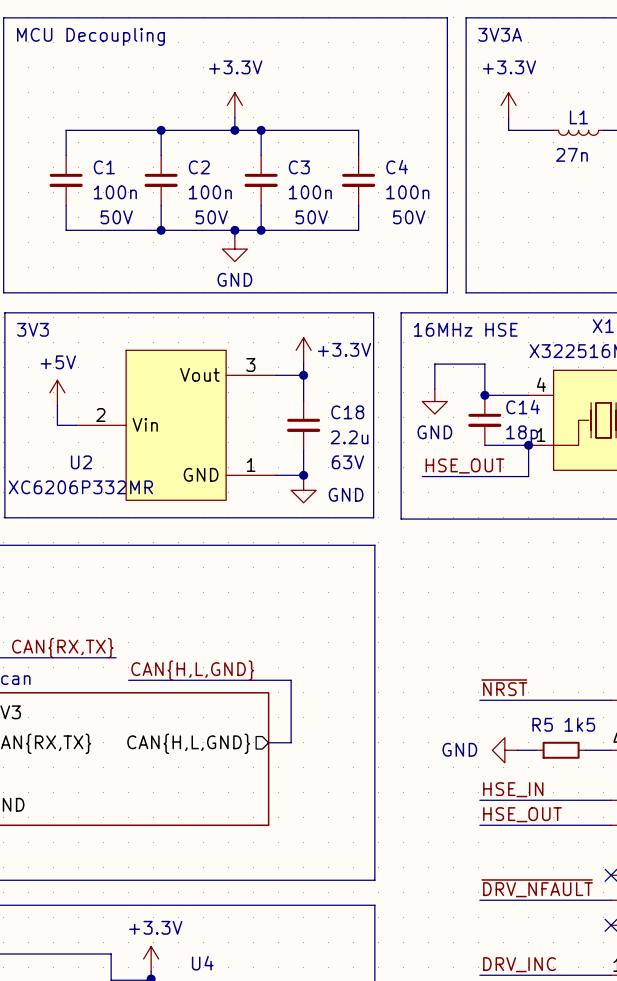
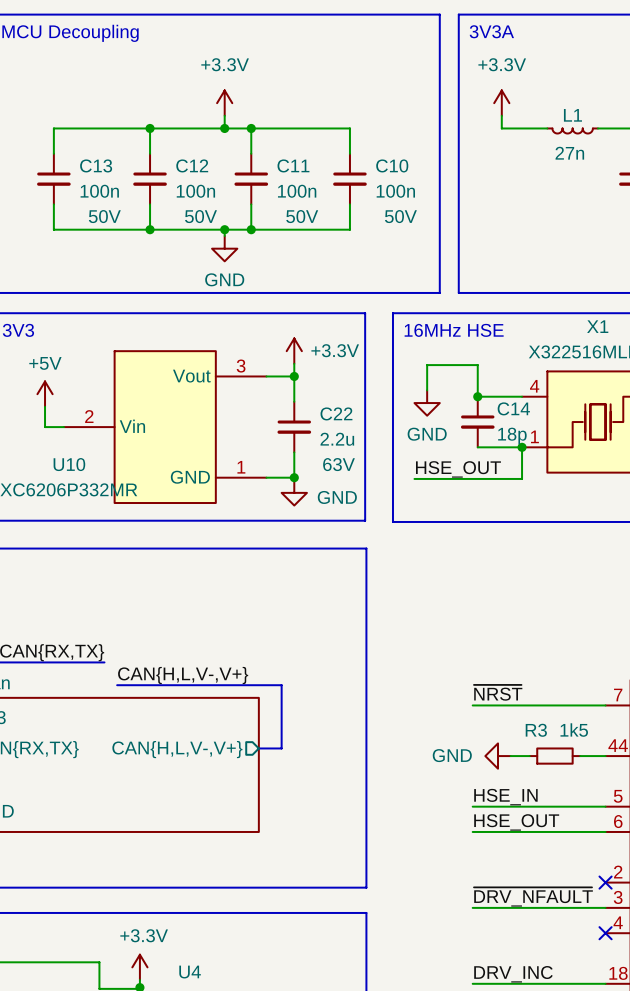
C1 name: C1 (104, 167) -> C13 (96, 165)
C2 name: C2 (199, 167) -> C12 (192, 165)
C3 name: C3 (299, 167) -> C11 (293, 165)
C4 name: C4 (397, 167) -> C10 (392, 165)
C18 name: C18 (347, 412) -> C22 (336, 413)
U2 name: U2 (81, 462) -> U10 (69, 464)
label: CAN{H,L,GND} (192, 670) -> CAN{H,L,V-,V+} (183, 675)
R5 name: R5 (542, 724) -> R3 (536, 730)
sheet pin: CAN{H,L,GND} (188, 743) -> CAN{H,L,V-,V+} (177, 749)

